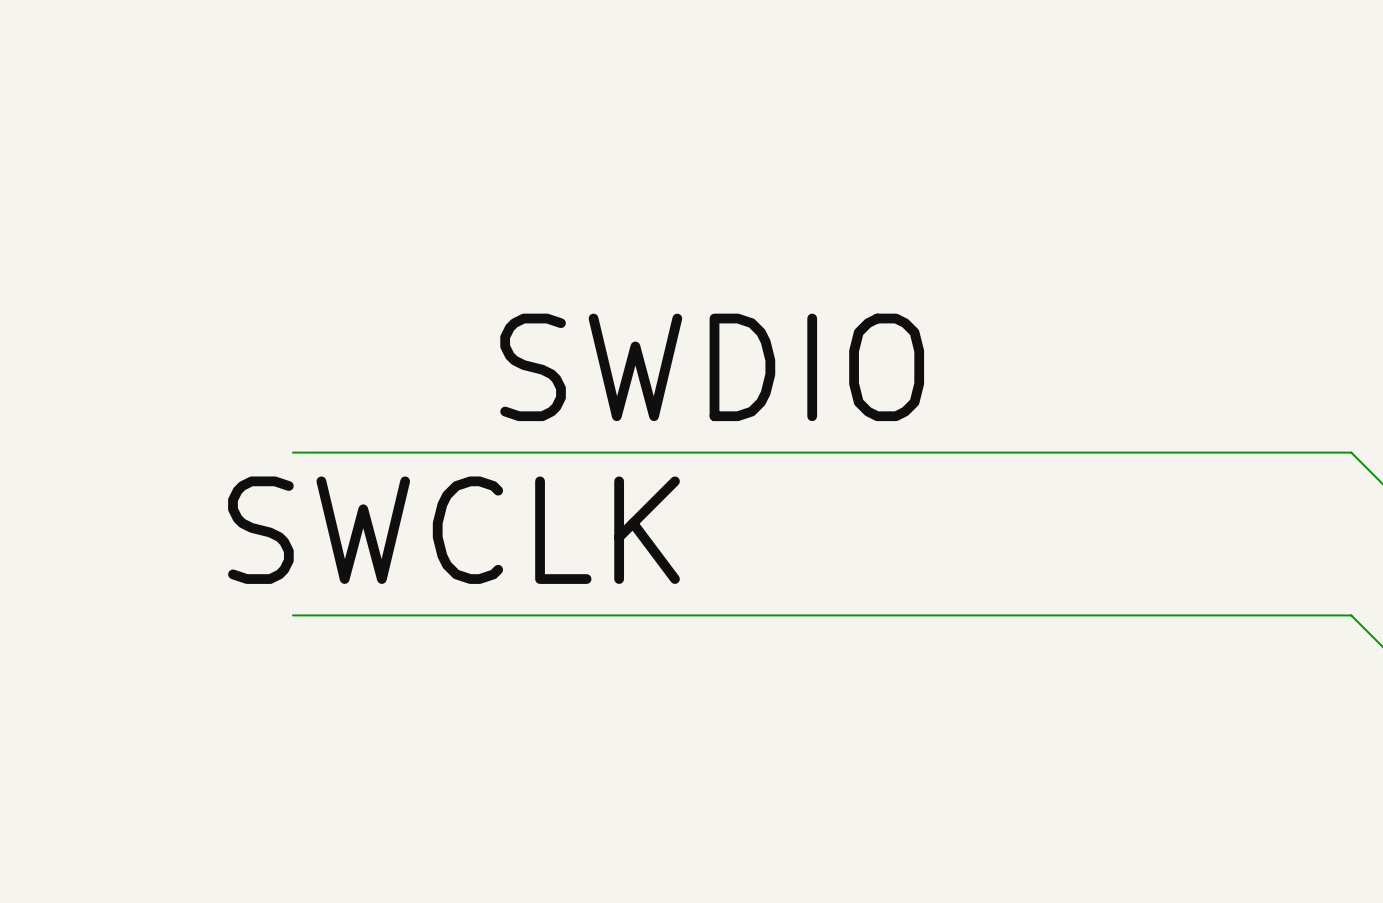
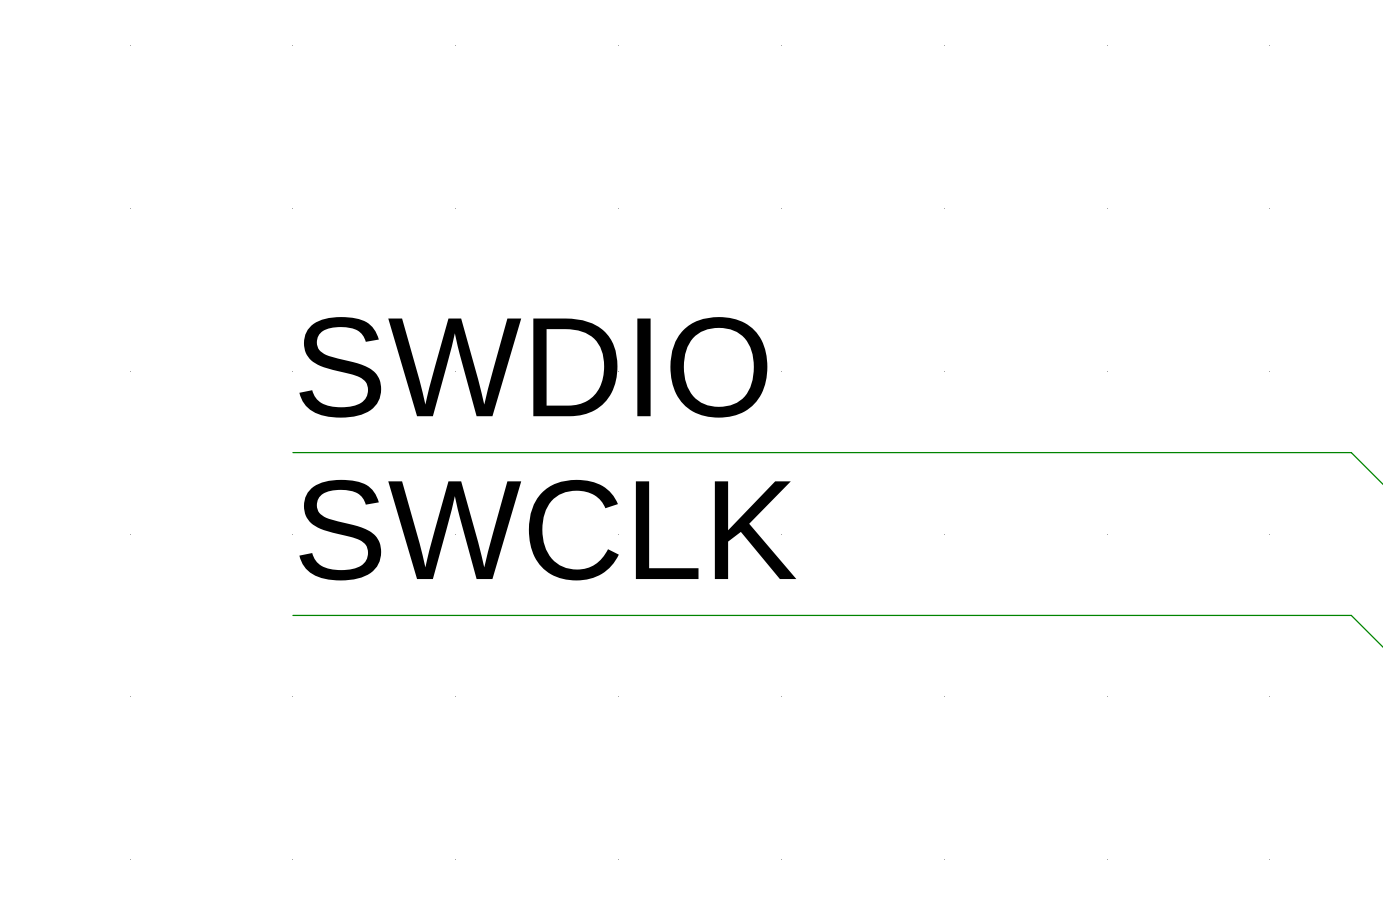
label position: SWDIO (712, 367) -> SWDIO (533, 367)
label position: SWCLK (453, 530) -> SWCLK (547, 530)

